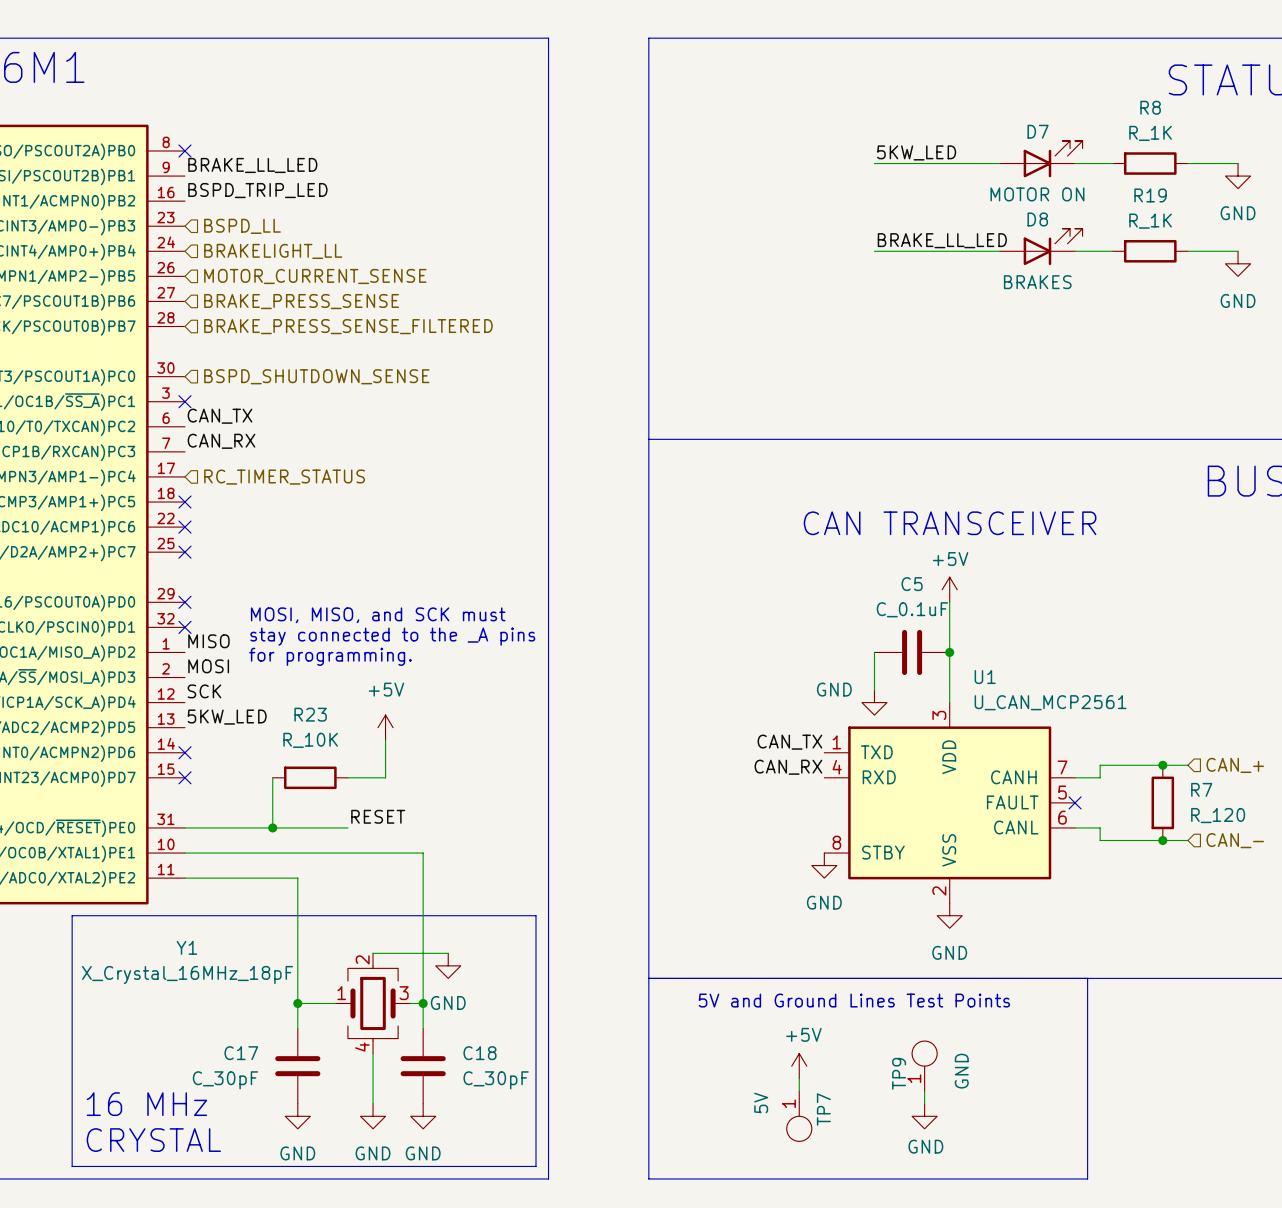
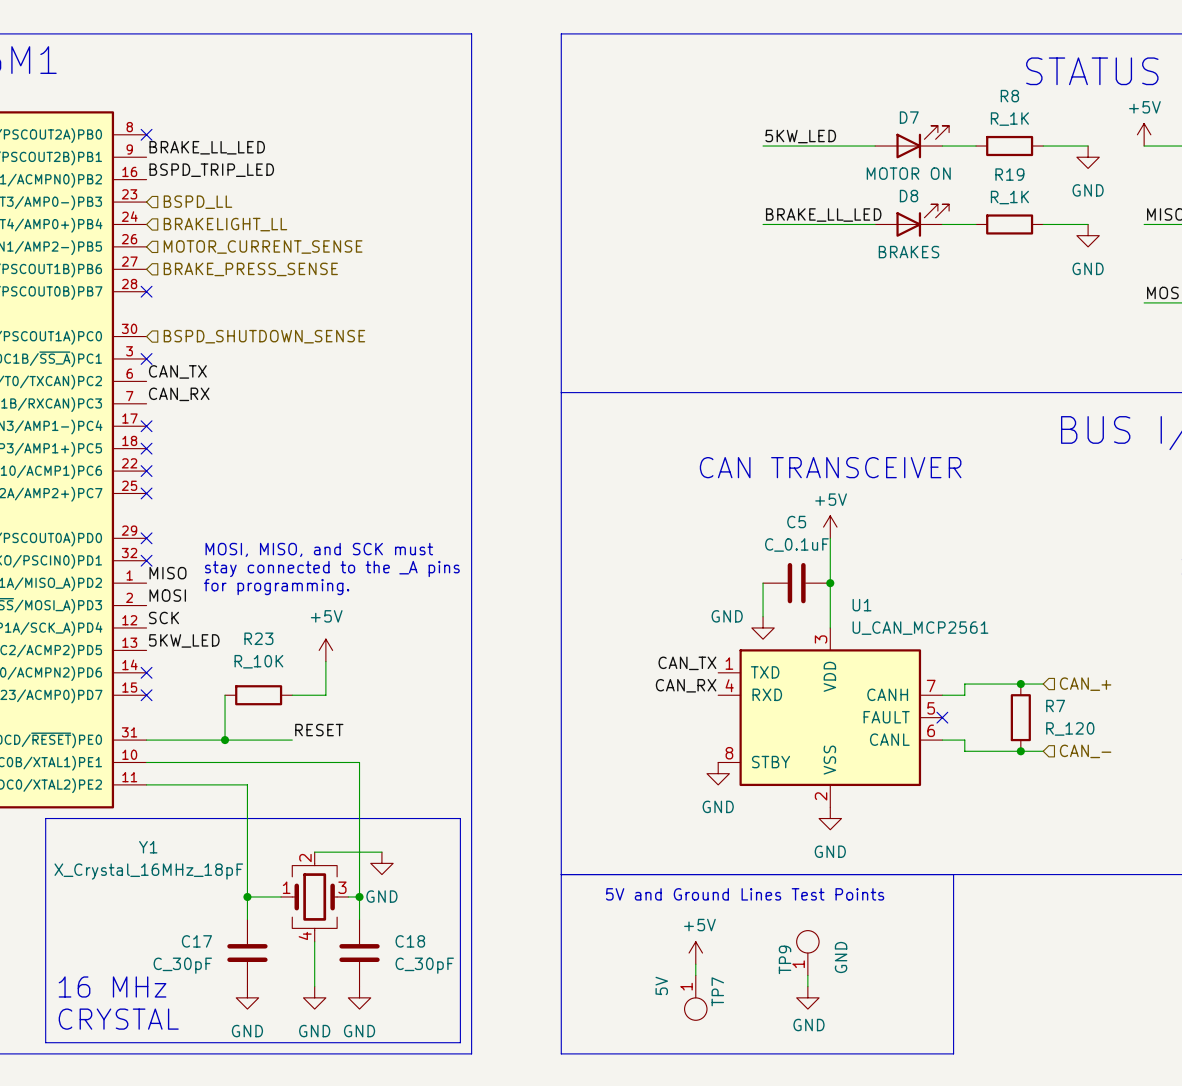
no-connect mark: none -> (146, 291)
hierarchical label: BRAKE_PRESS_SENSE_FILTERED (348, 326) -> none
no-connect mark: none -> (146, 426)
hierarchical label: RC_TIMER_STATUS (284, 477) -> none

